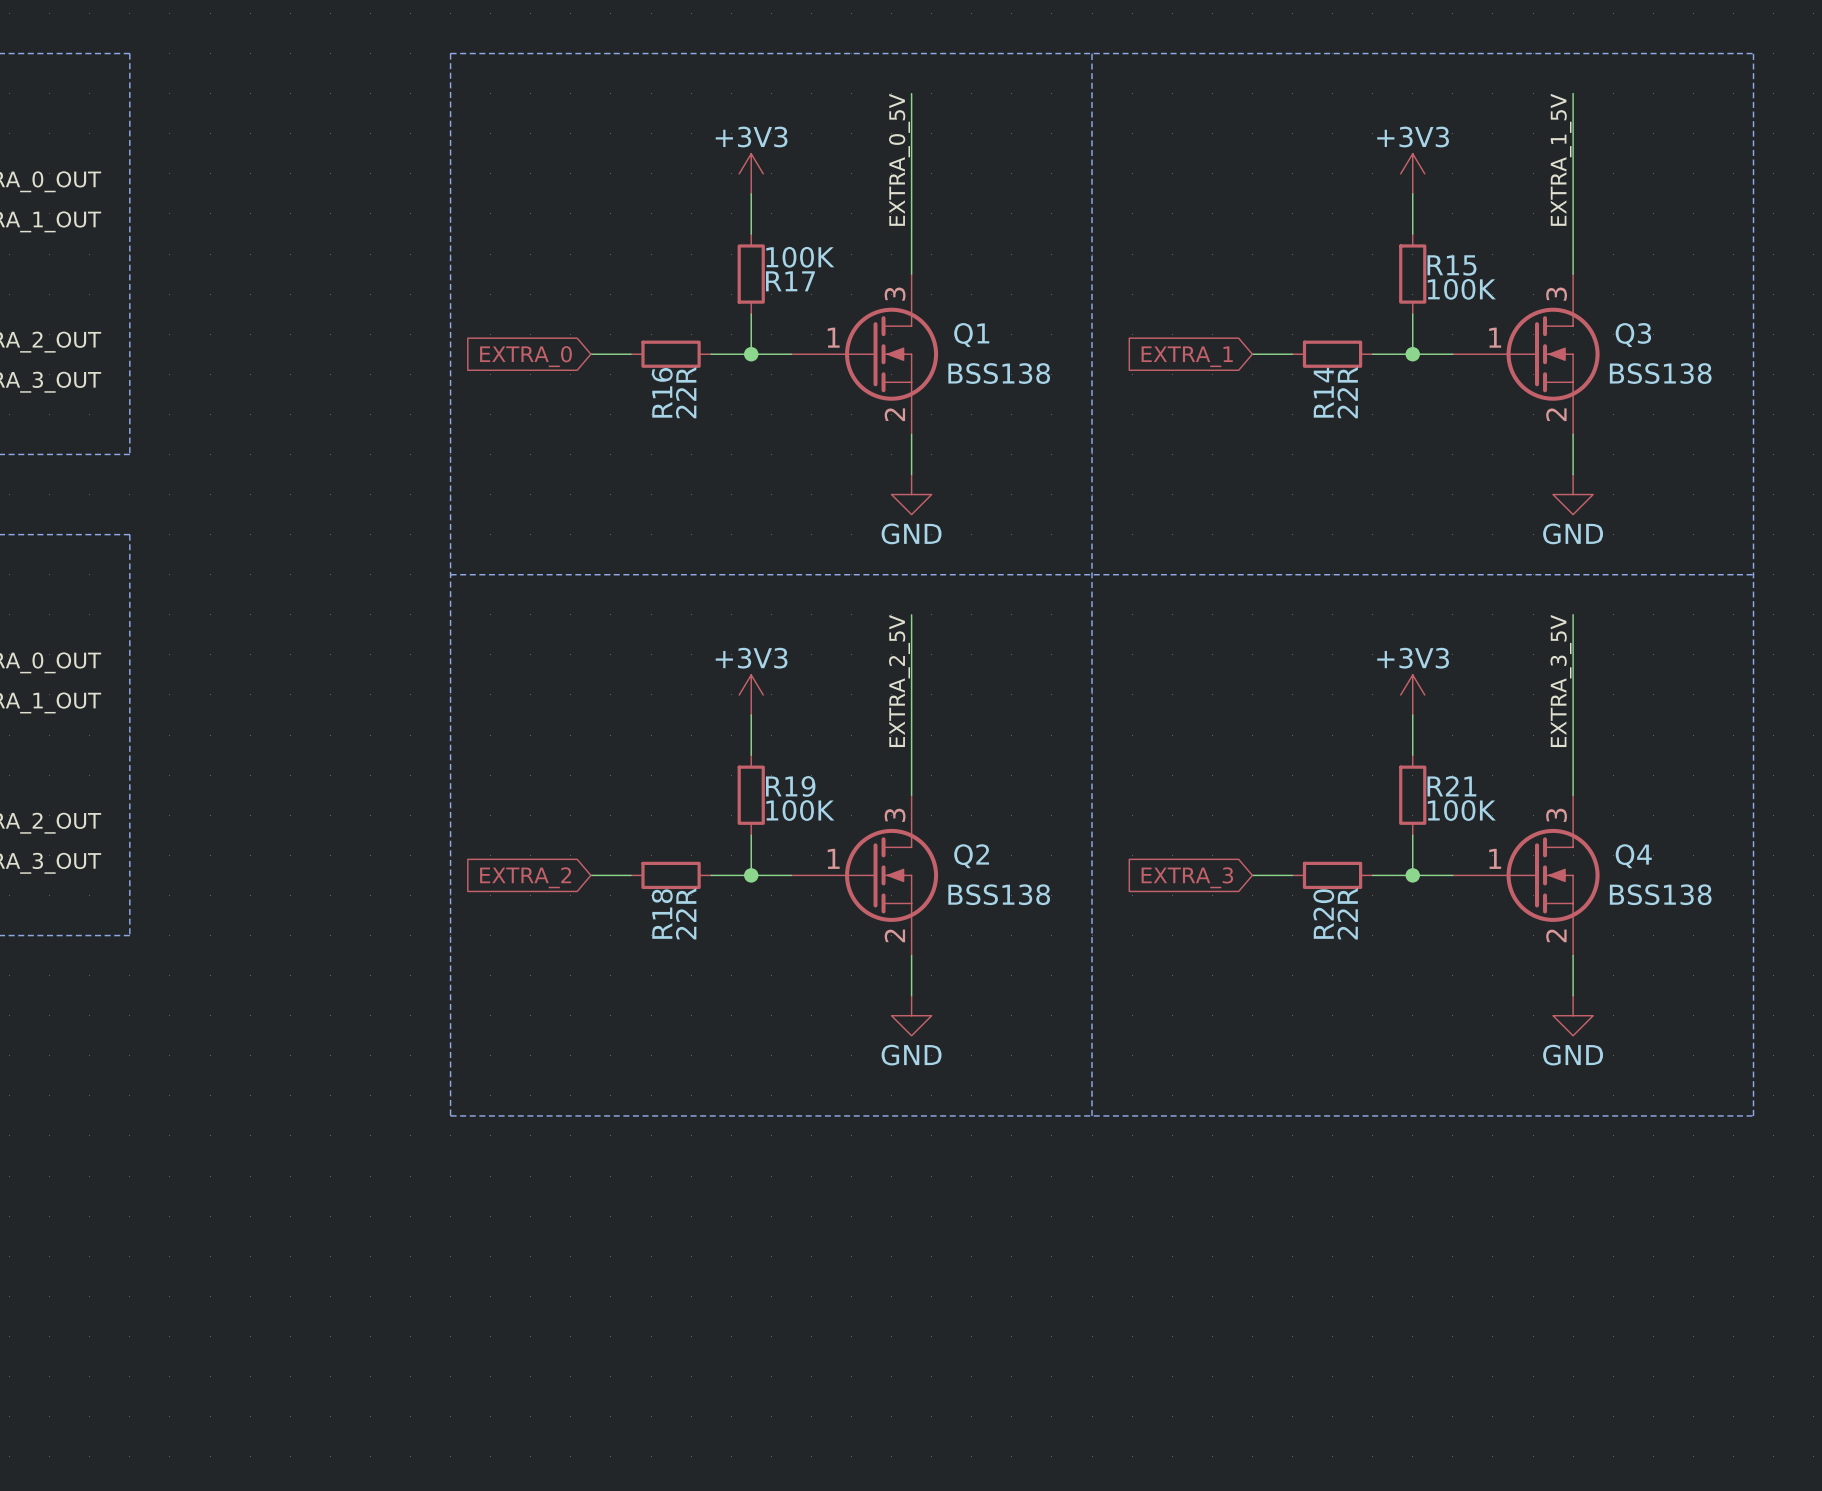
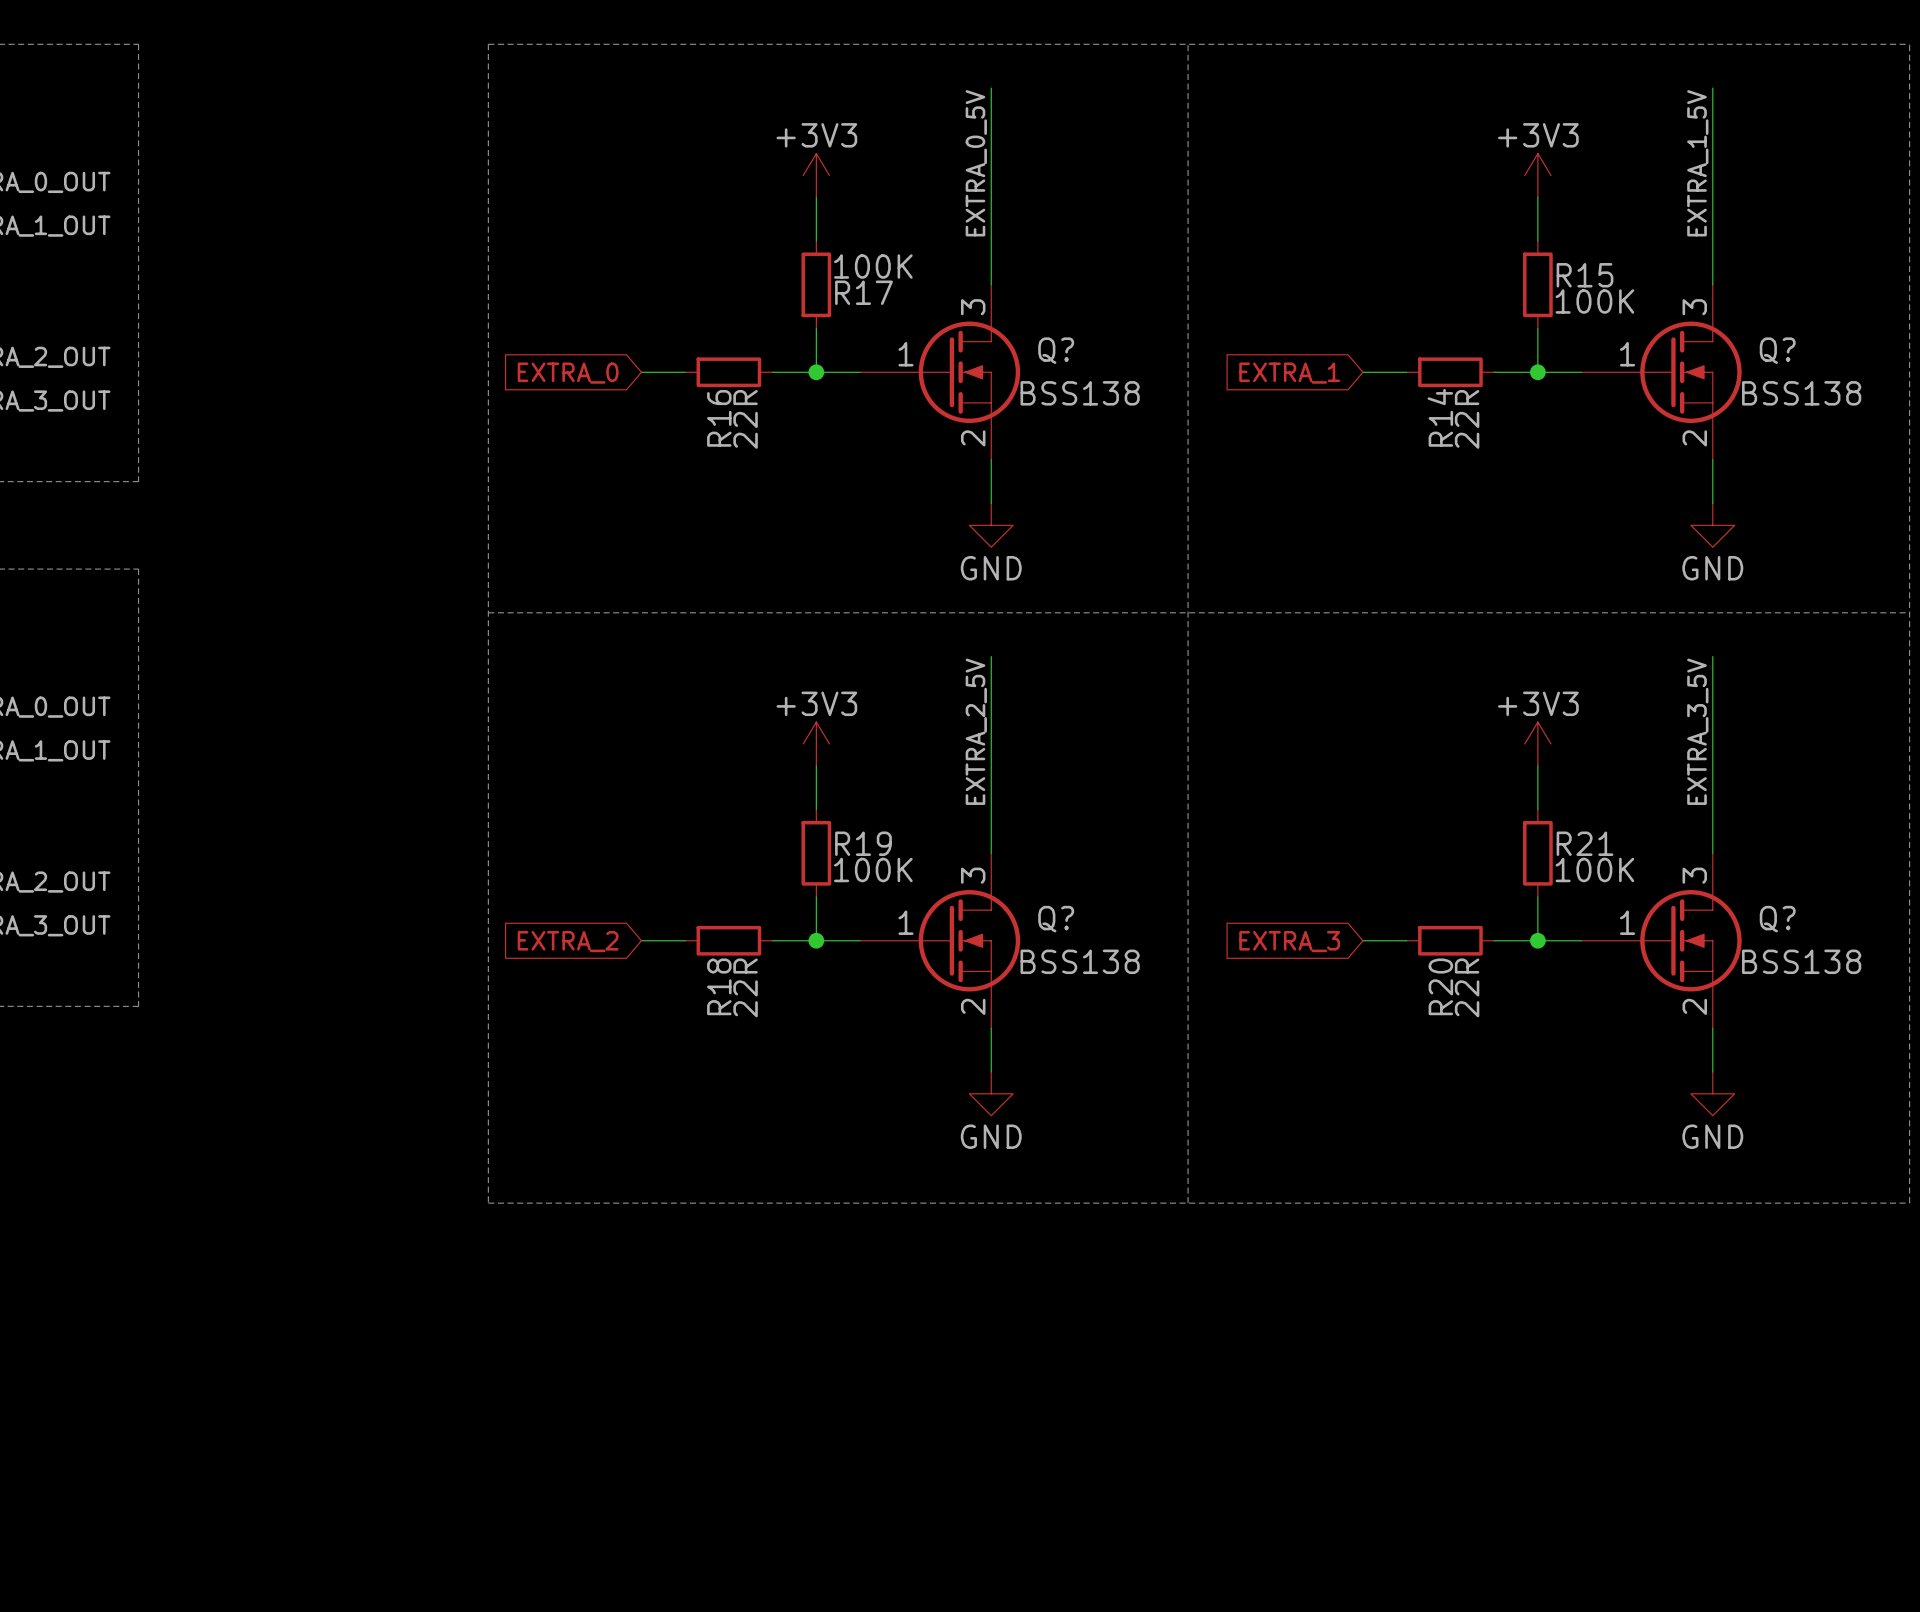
Q1 name: Q1 (971, 335) -> Q? (1056, 350)
Q3 name: Q3 (1633, 335) -> Q? (1777, 350)
Q2 name: Q2 (971, 856) -> Q? (1056, 919)
Q4 name: Q4 (1633, 856) -> Q? (1777, 919)

